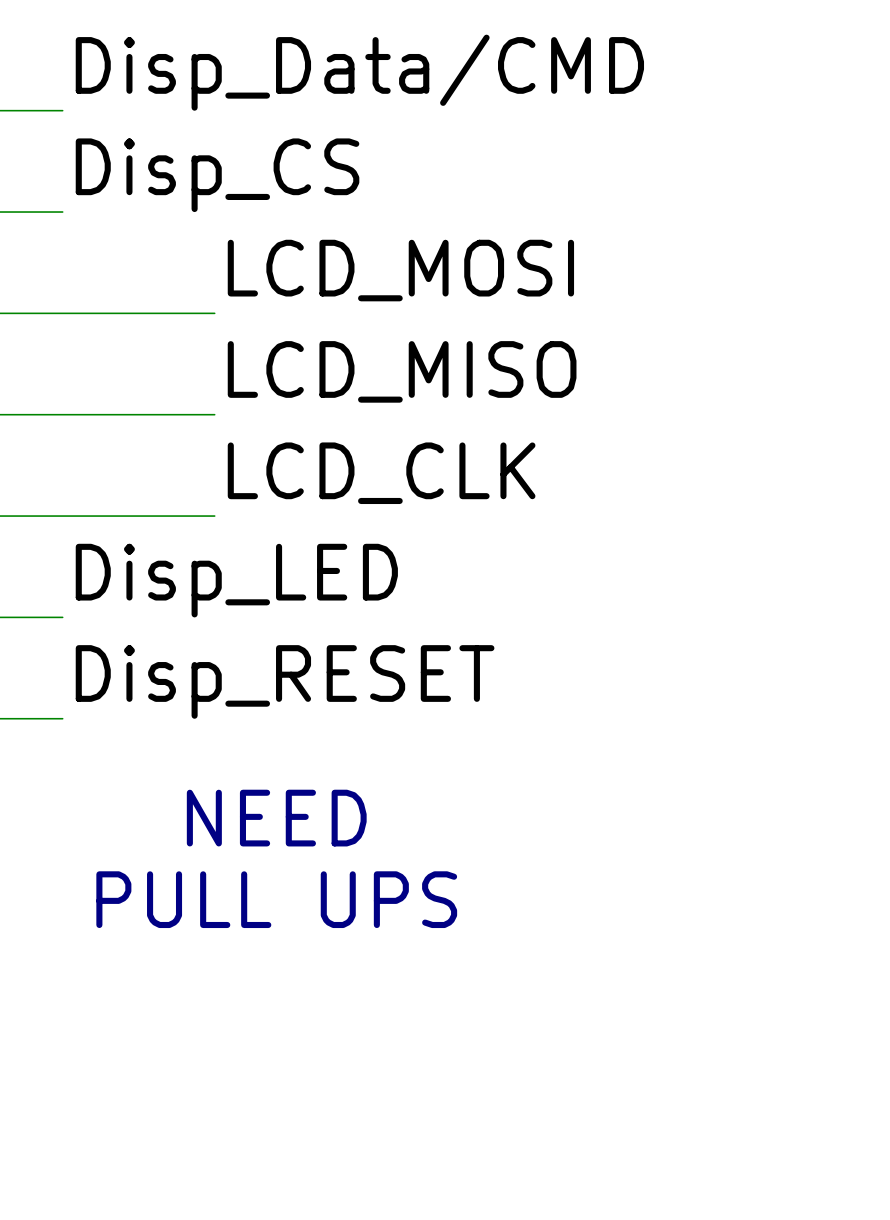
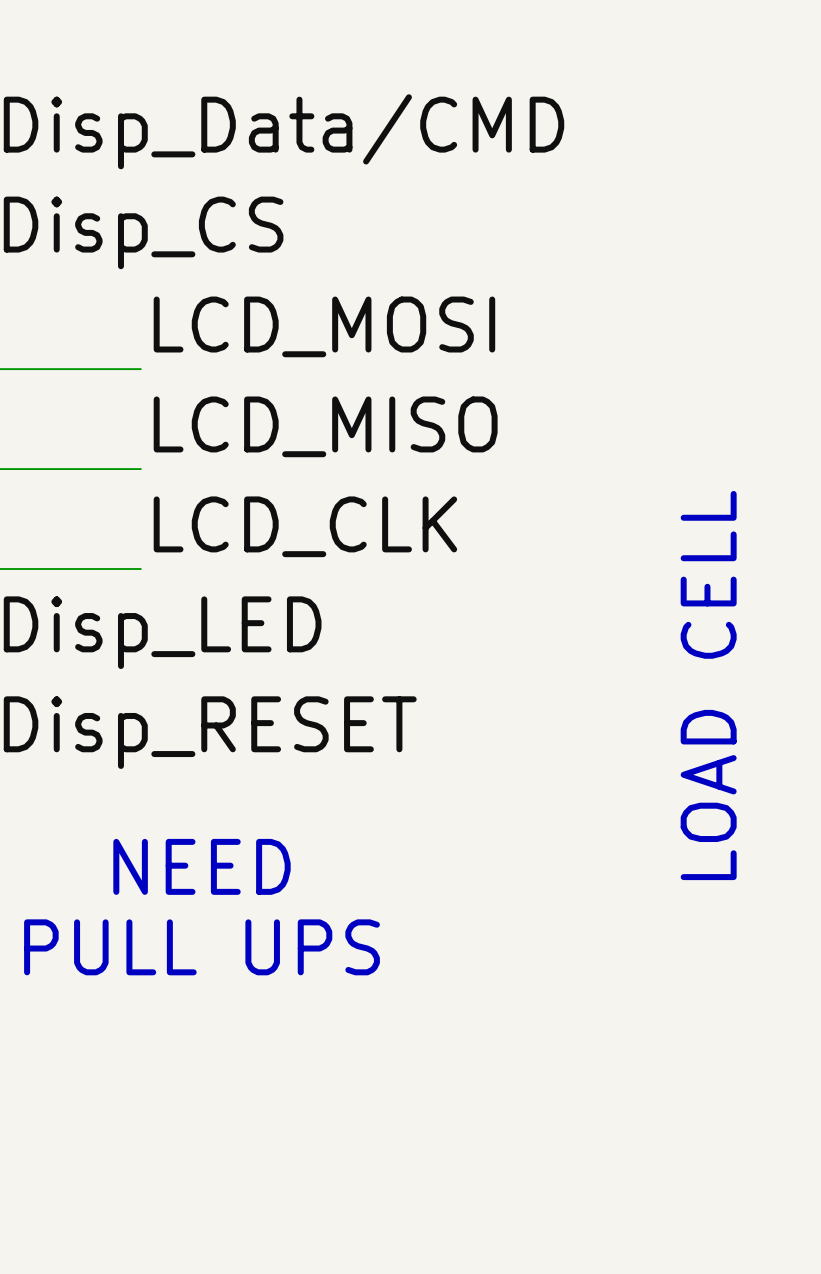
text: none -> LOAD CELL (708, 685)

